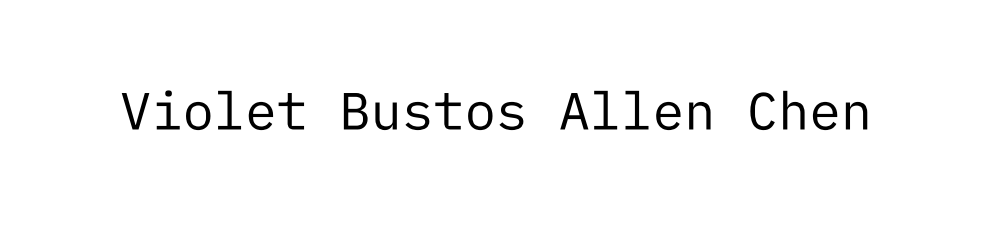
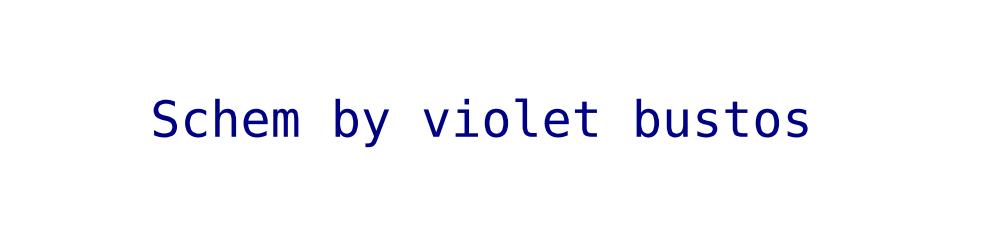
text: Violet Bustos Allen Chen (494, 110) -> Schem by violet bustos (480, 122)

